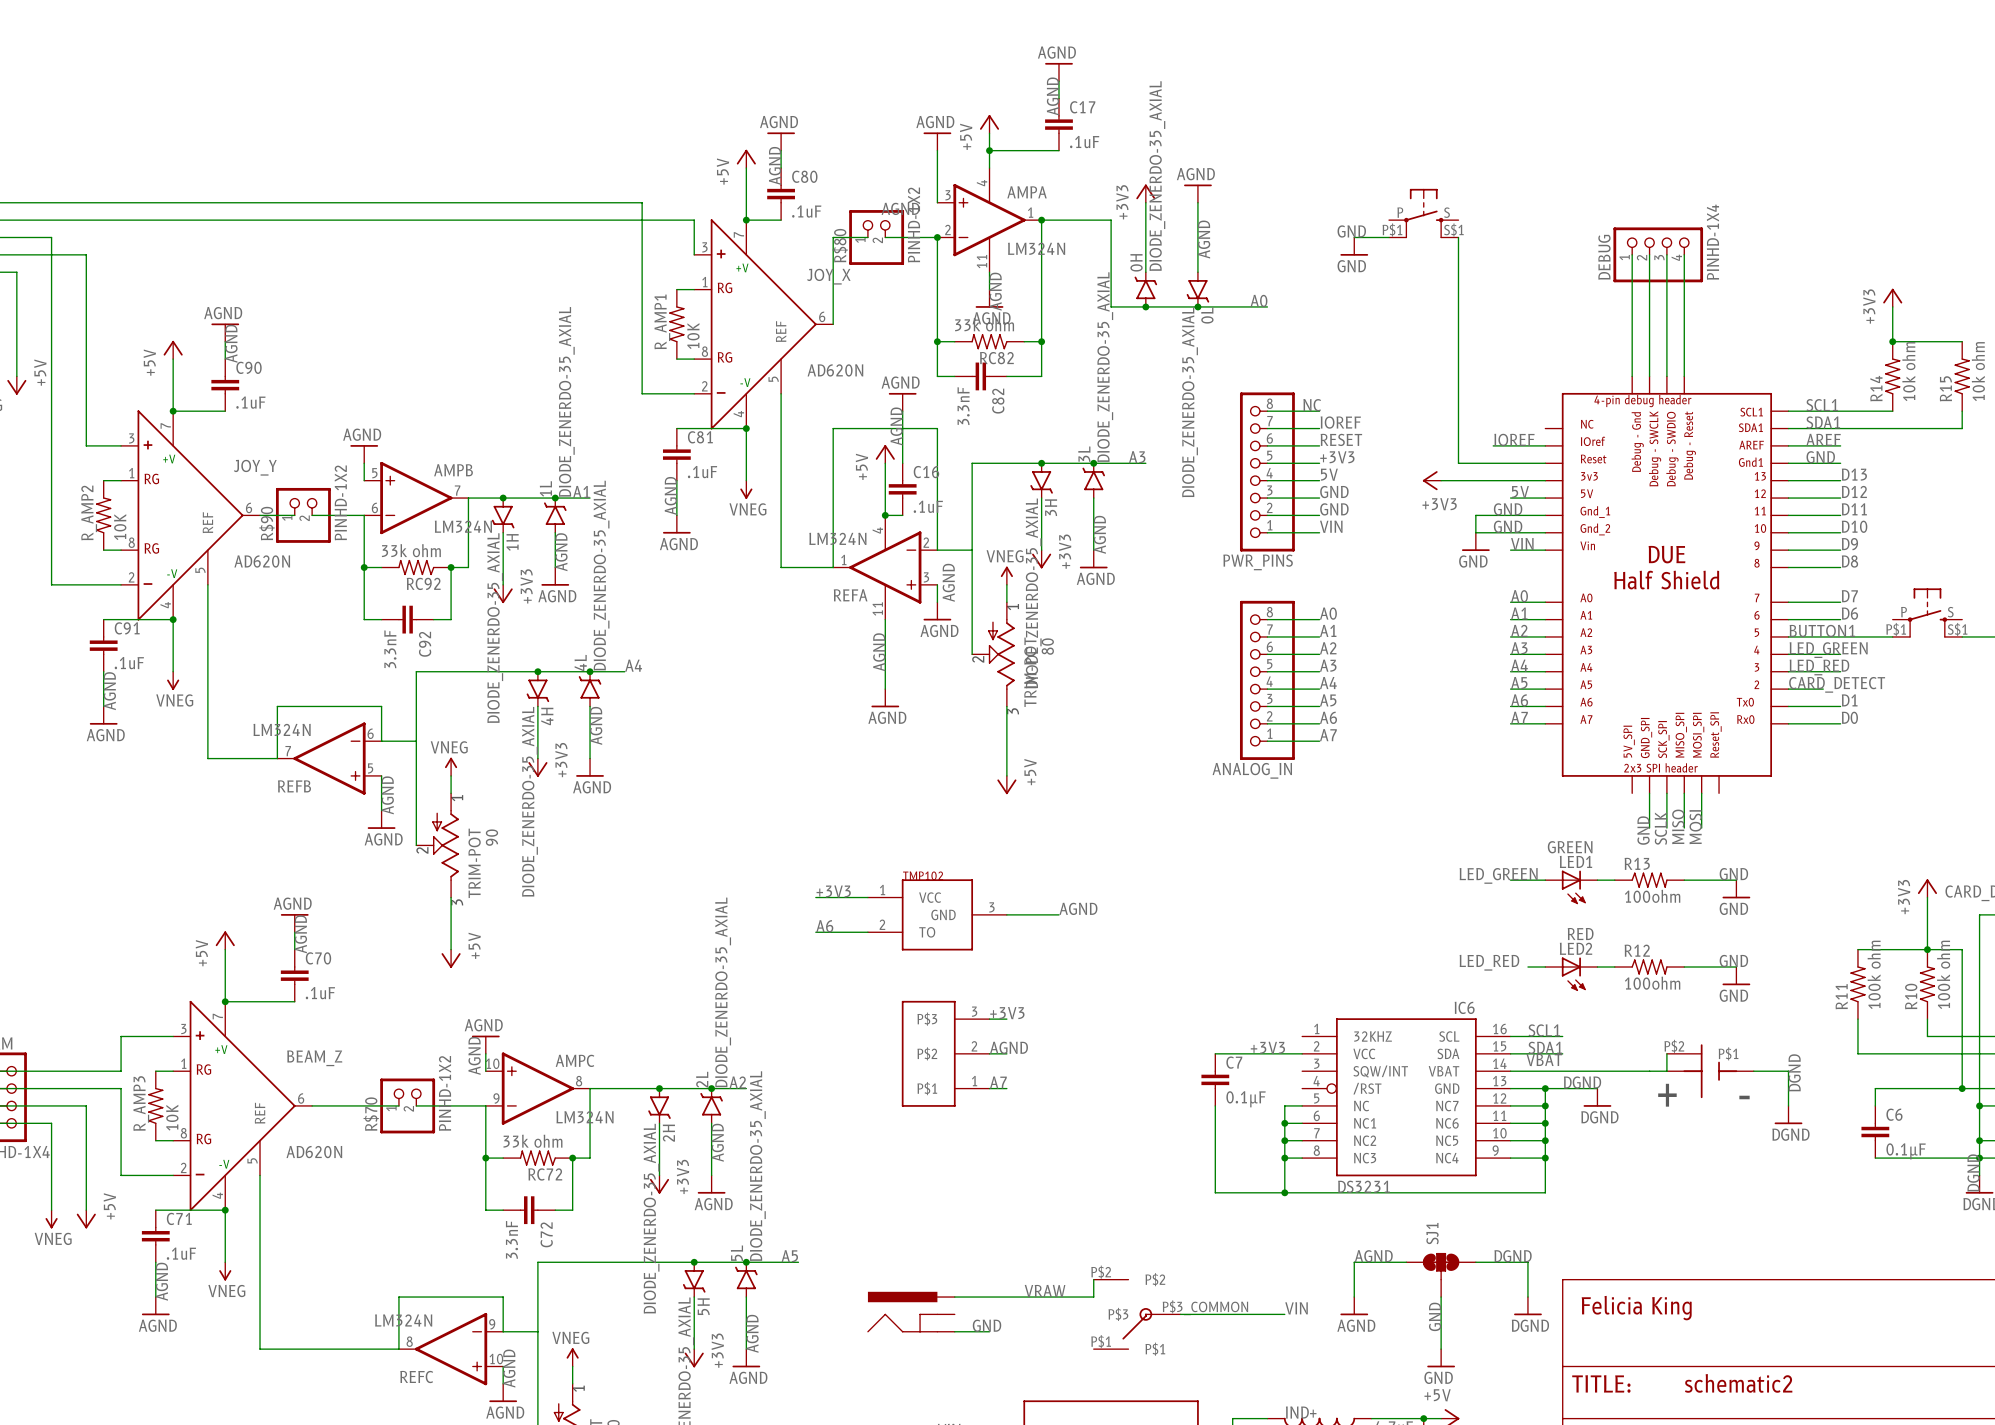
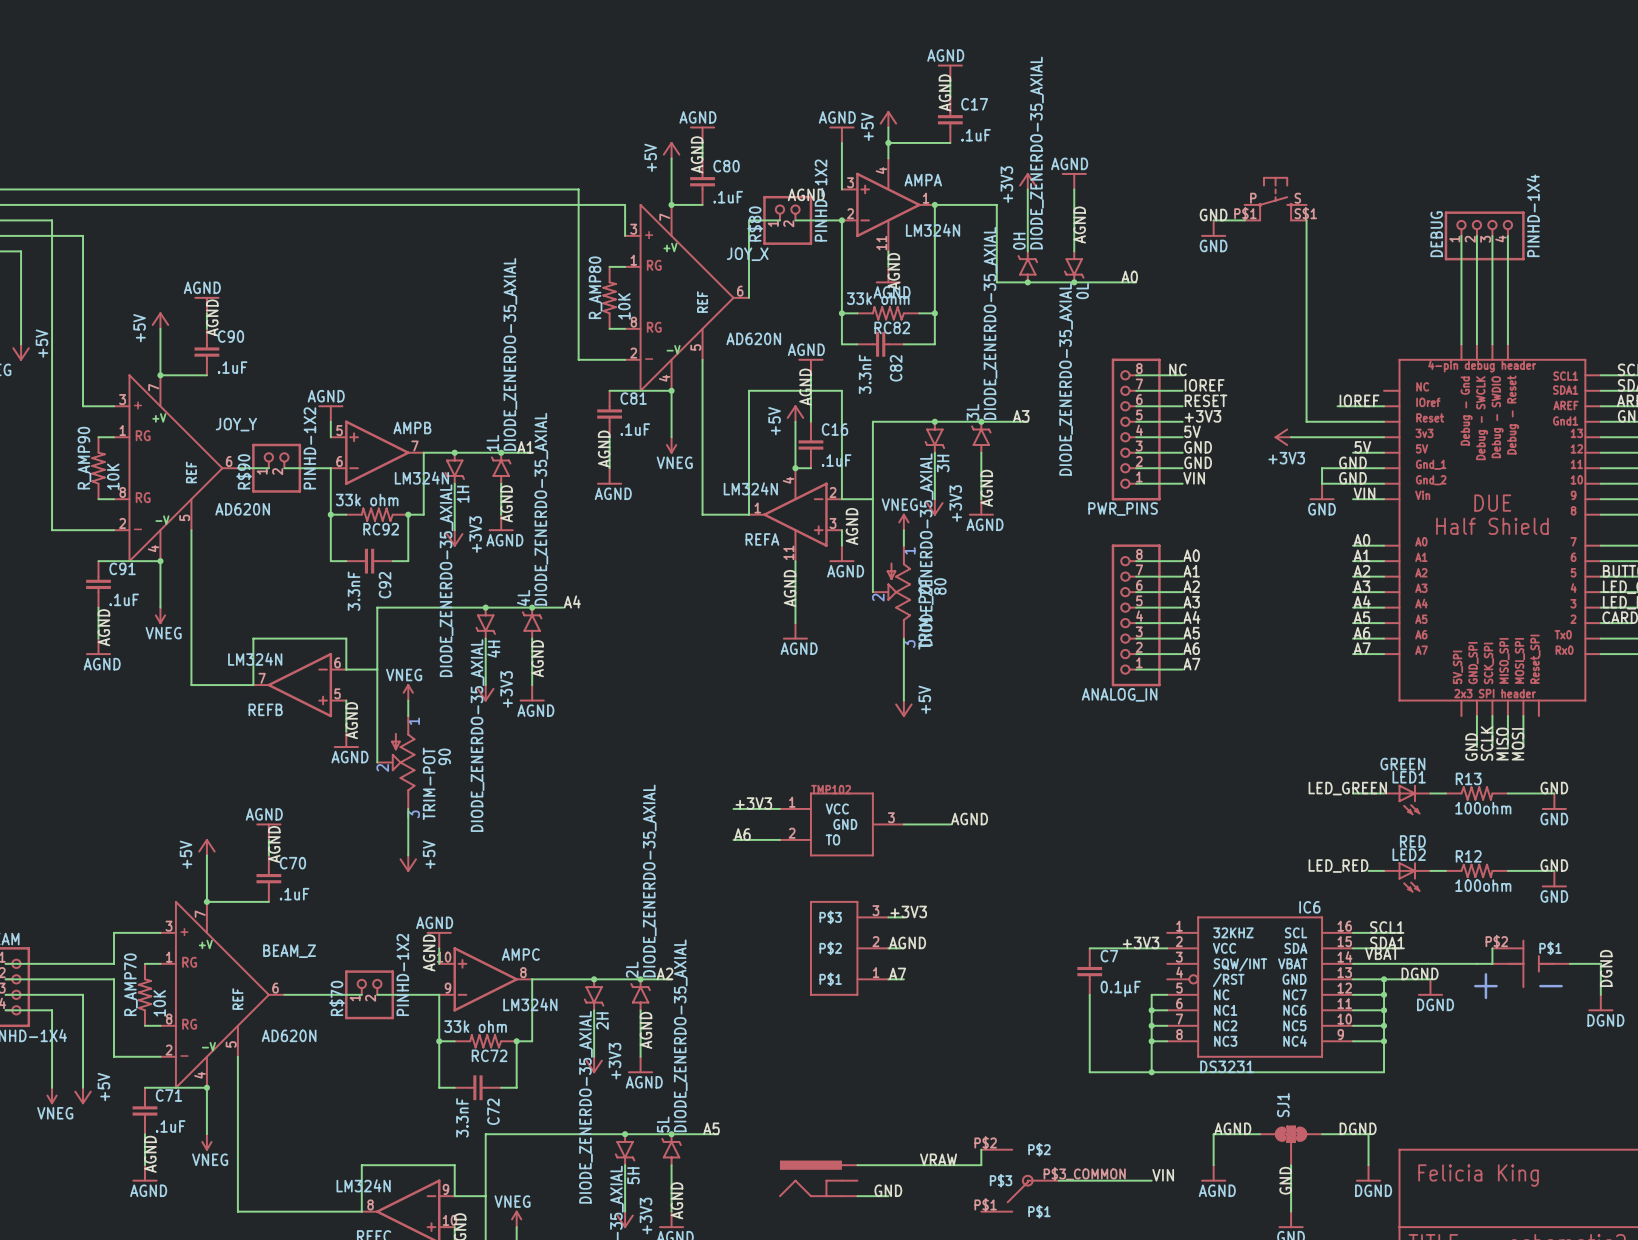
R_AMP1 name: R_AMP1 (662, 321) -> R_AMP80 (595, 287)
R_AMP2 name: R_AMP2 (89, 512) -> R_AMP90 (84, 458)
R_AMP3 name: R_AMP3 (141, 1103) -> R_AMP70 (130, 984)

